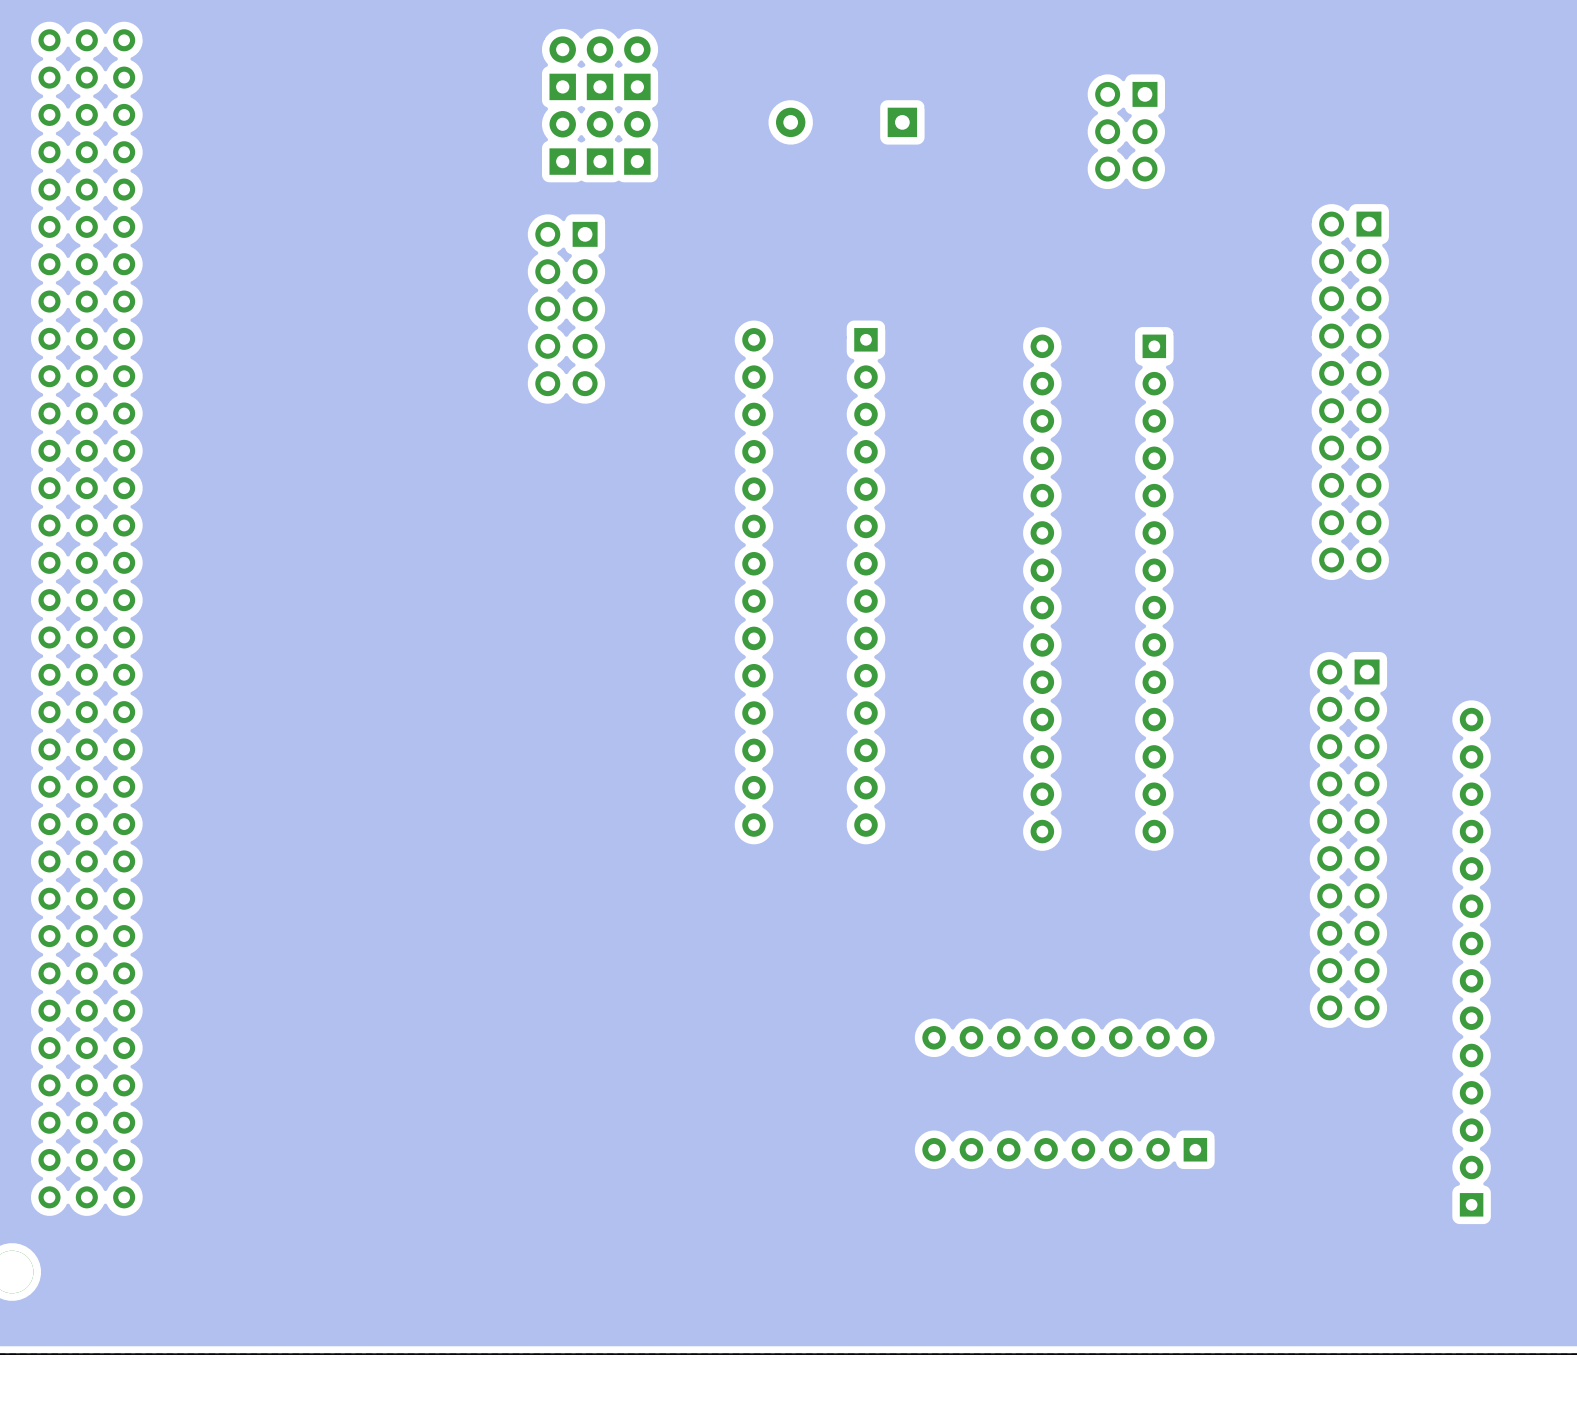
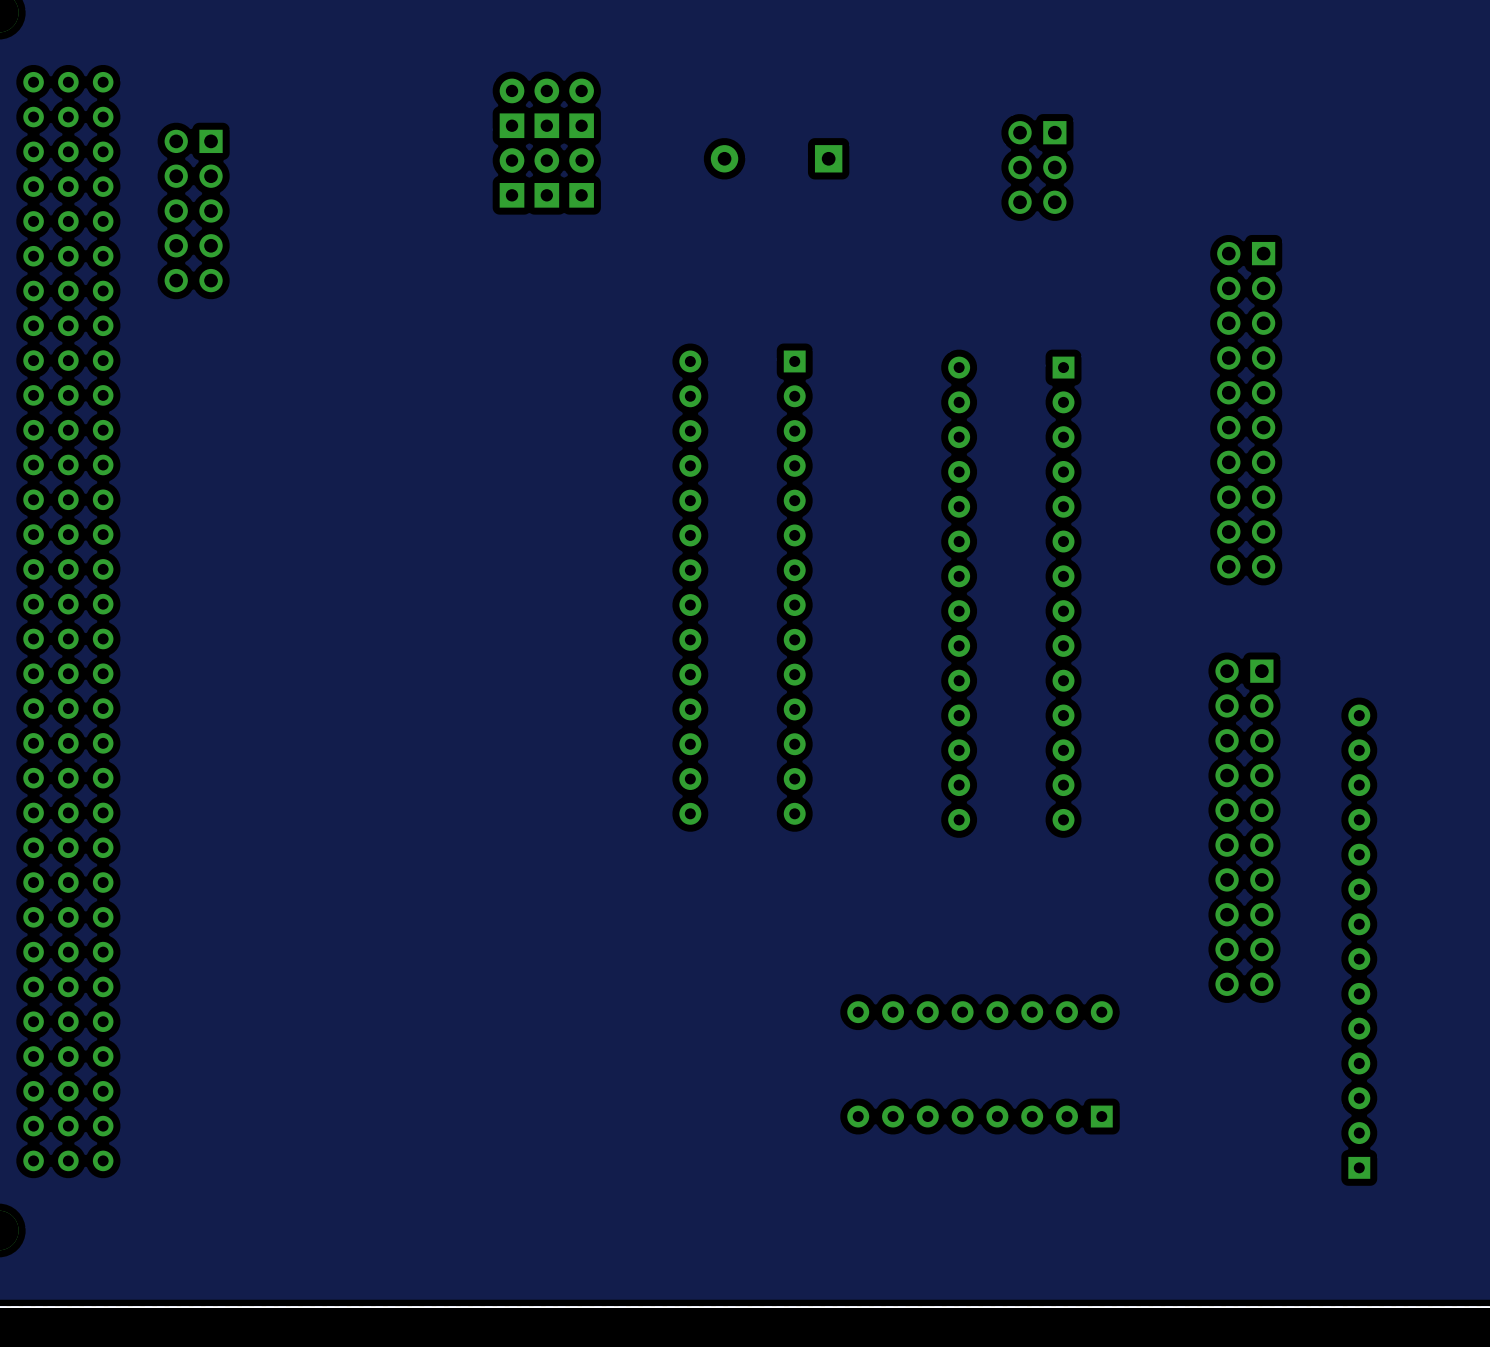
part: none -> (193, 210)
part: (566, 309) -> none

